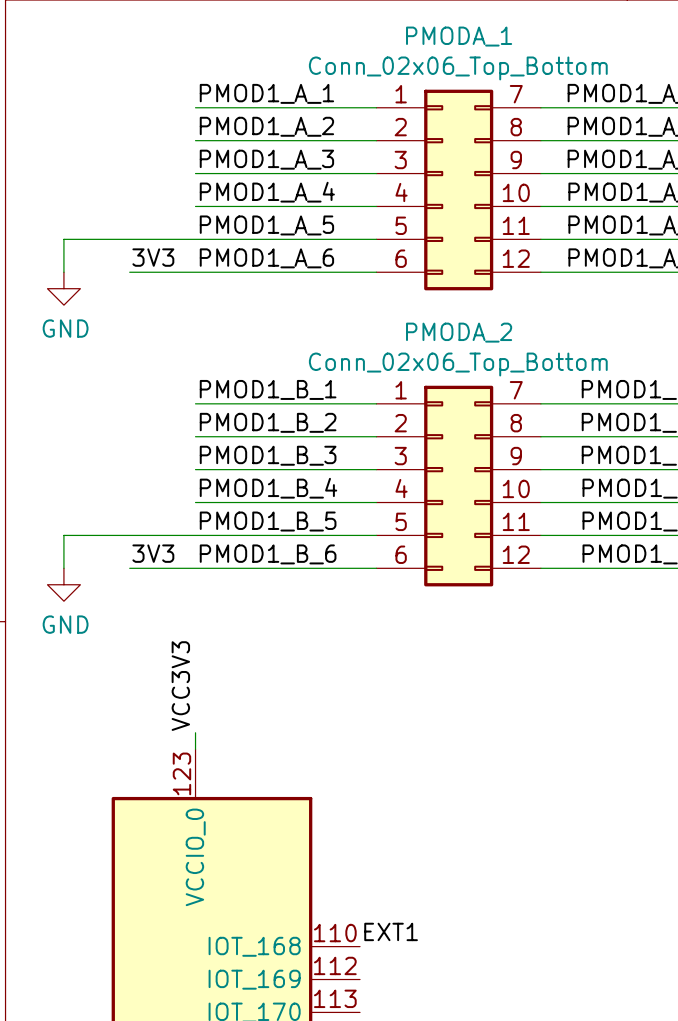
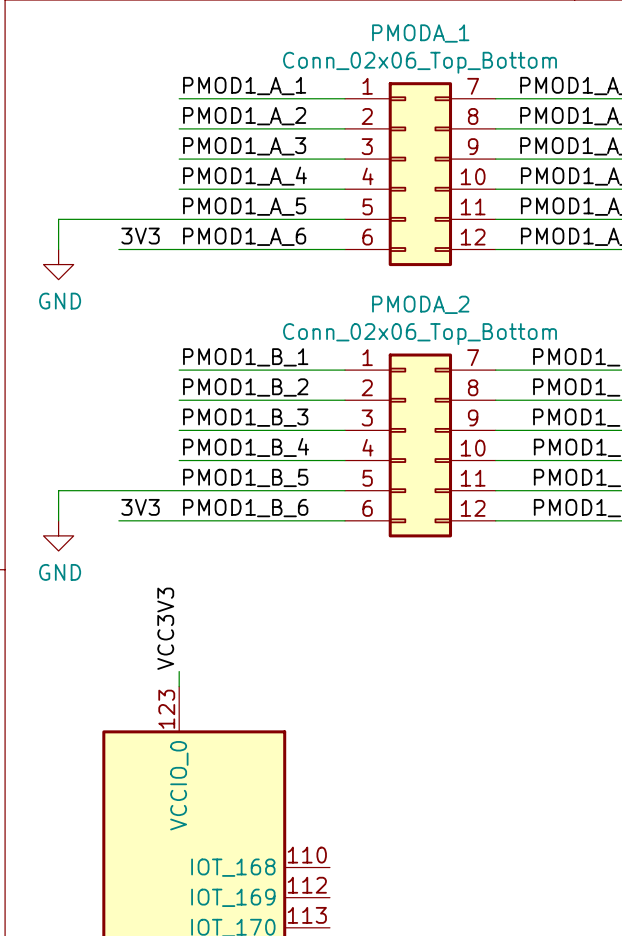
label: EXT1 (391, 931) -> none

